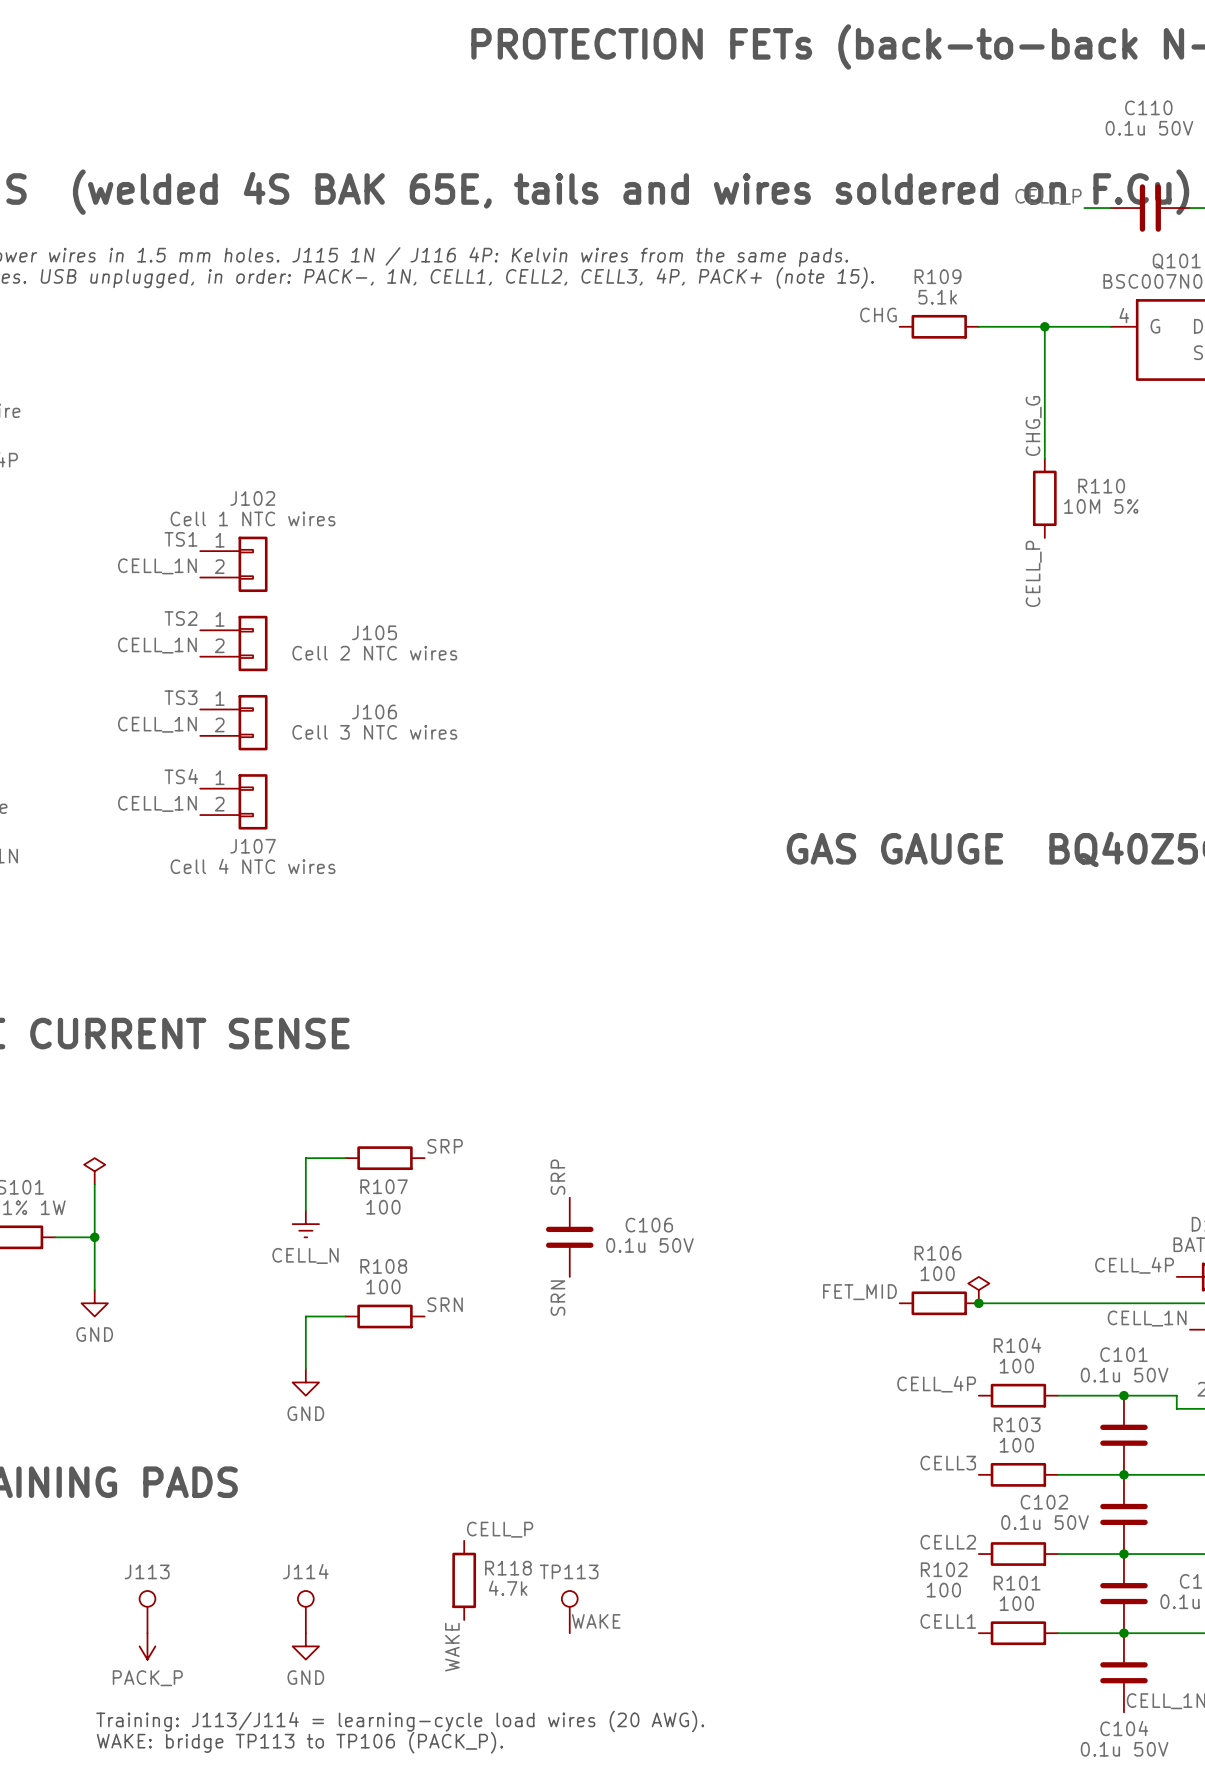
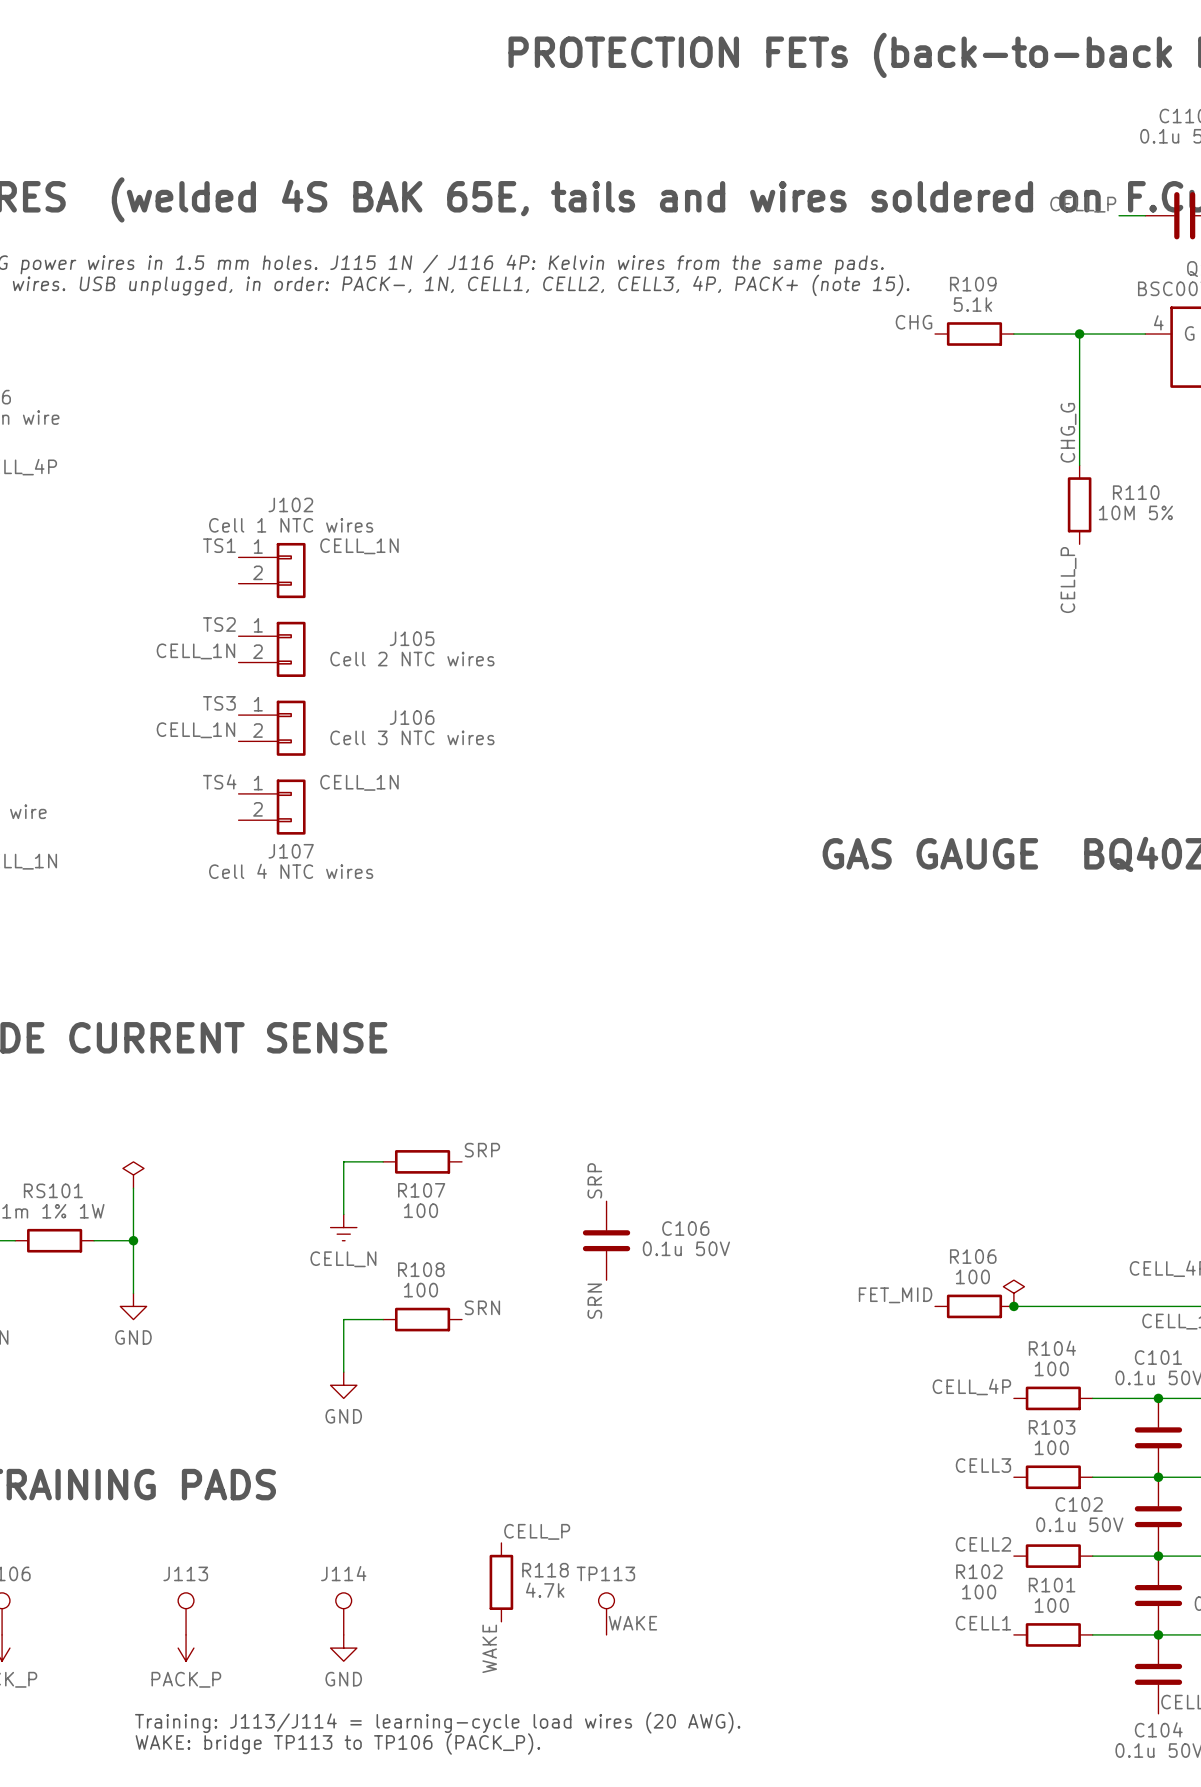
label position: CELL_1N (157, 566) -> CELL_1N (359, 546)
label position: CELL_1N (157, 803) -> CELL_1N (359, 782)

